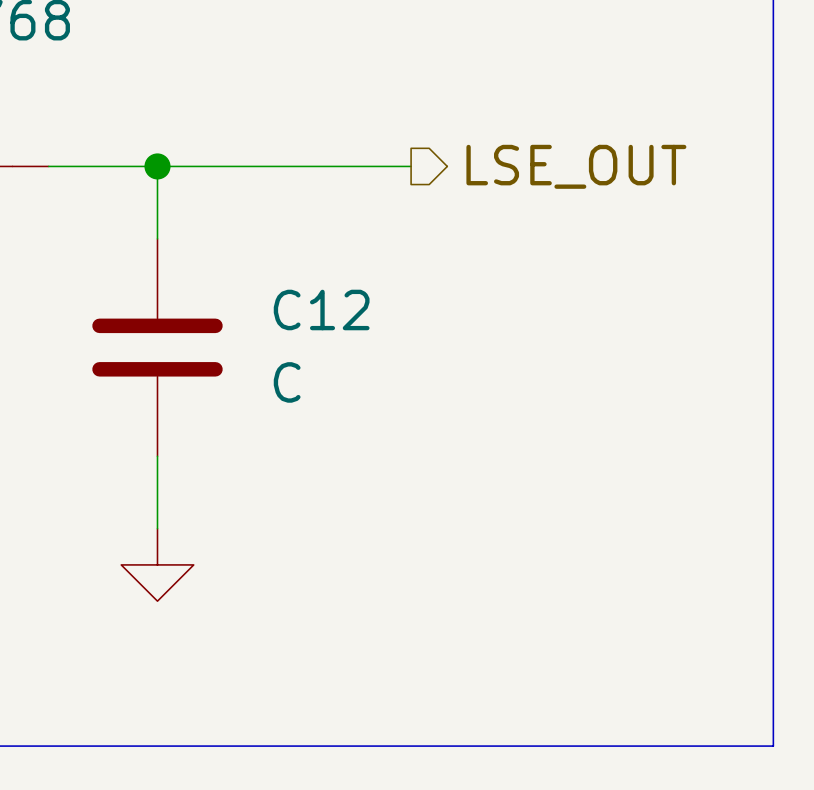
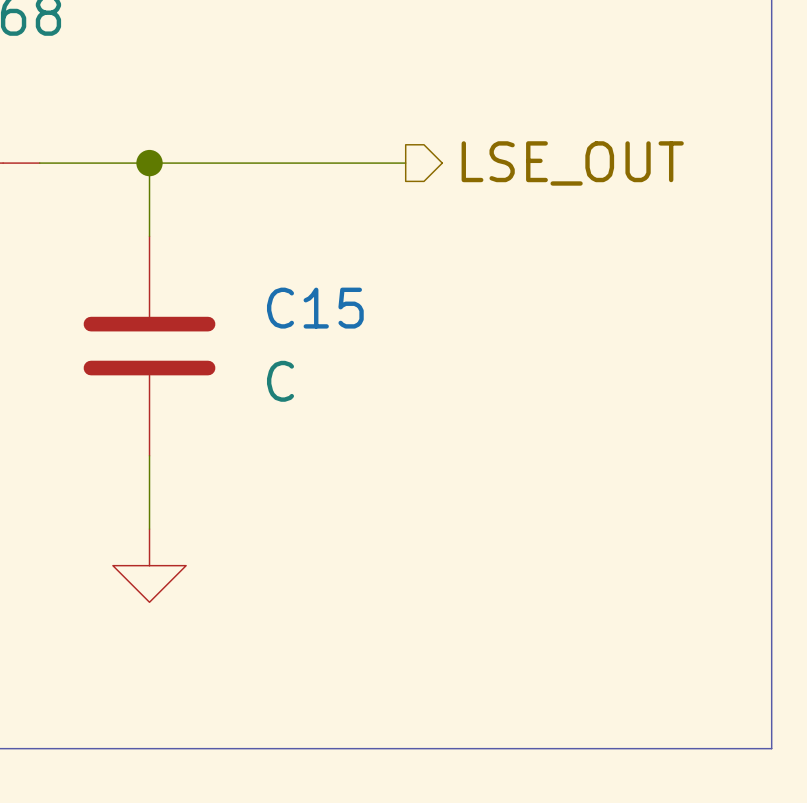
C12 name: C12 (321, 309) -> C15 (315, 308)

